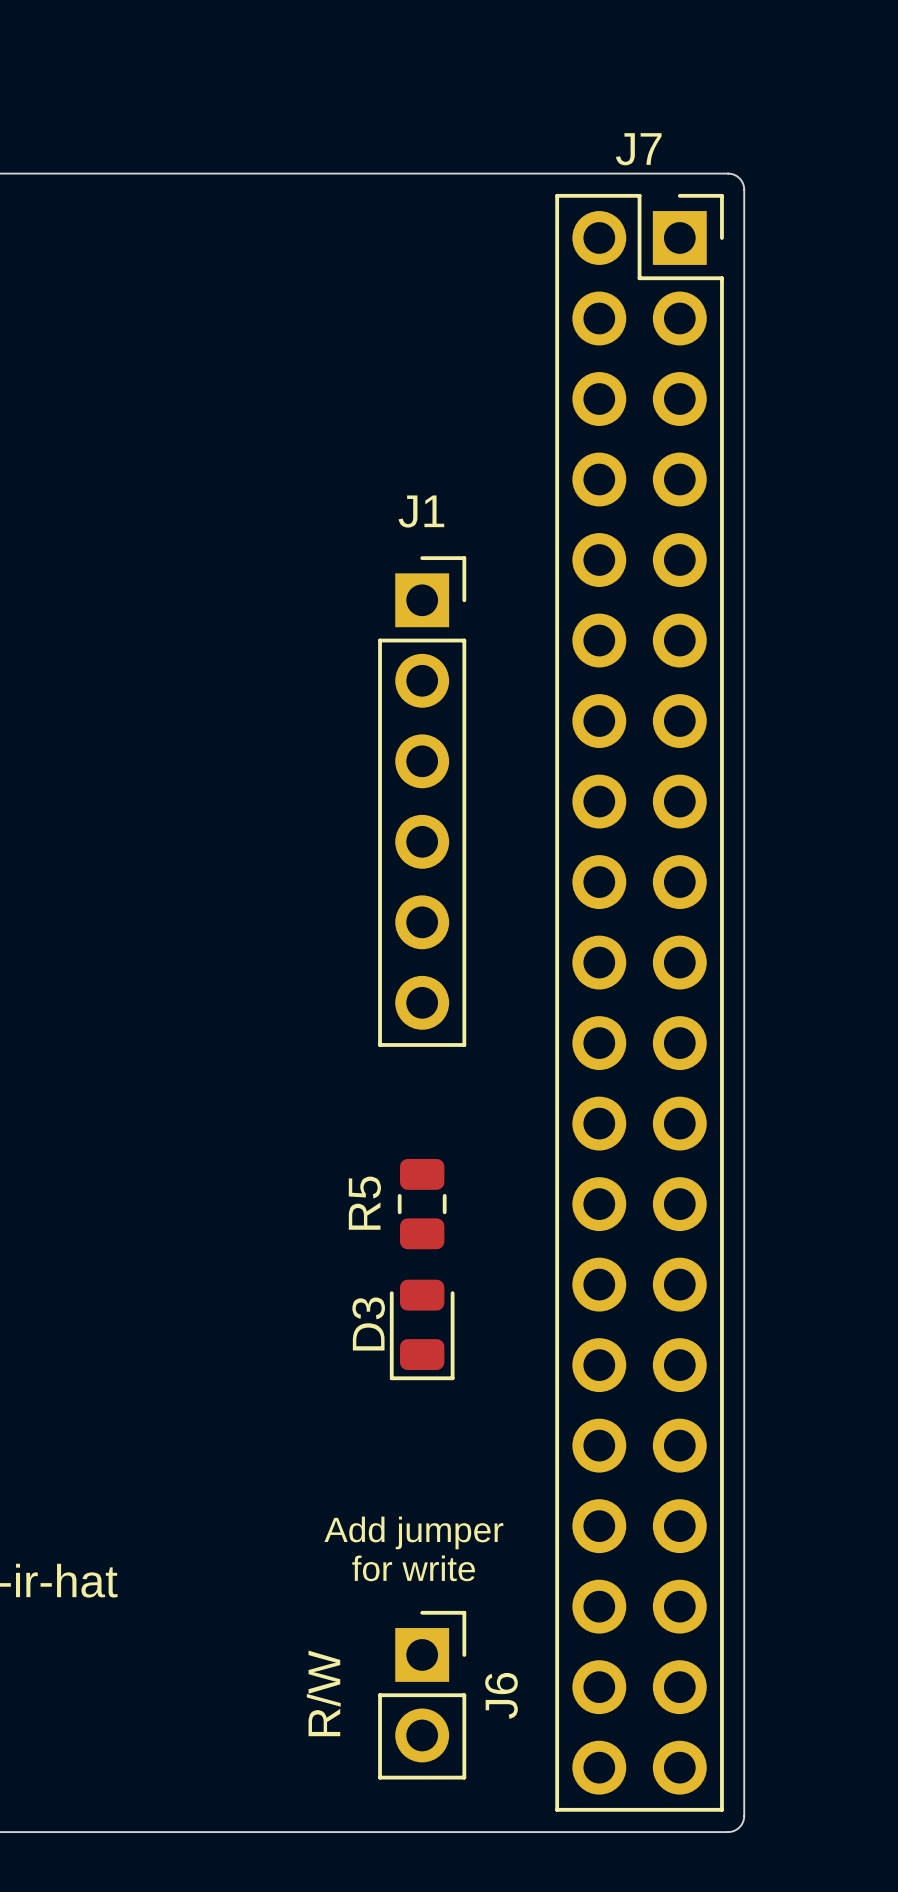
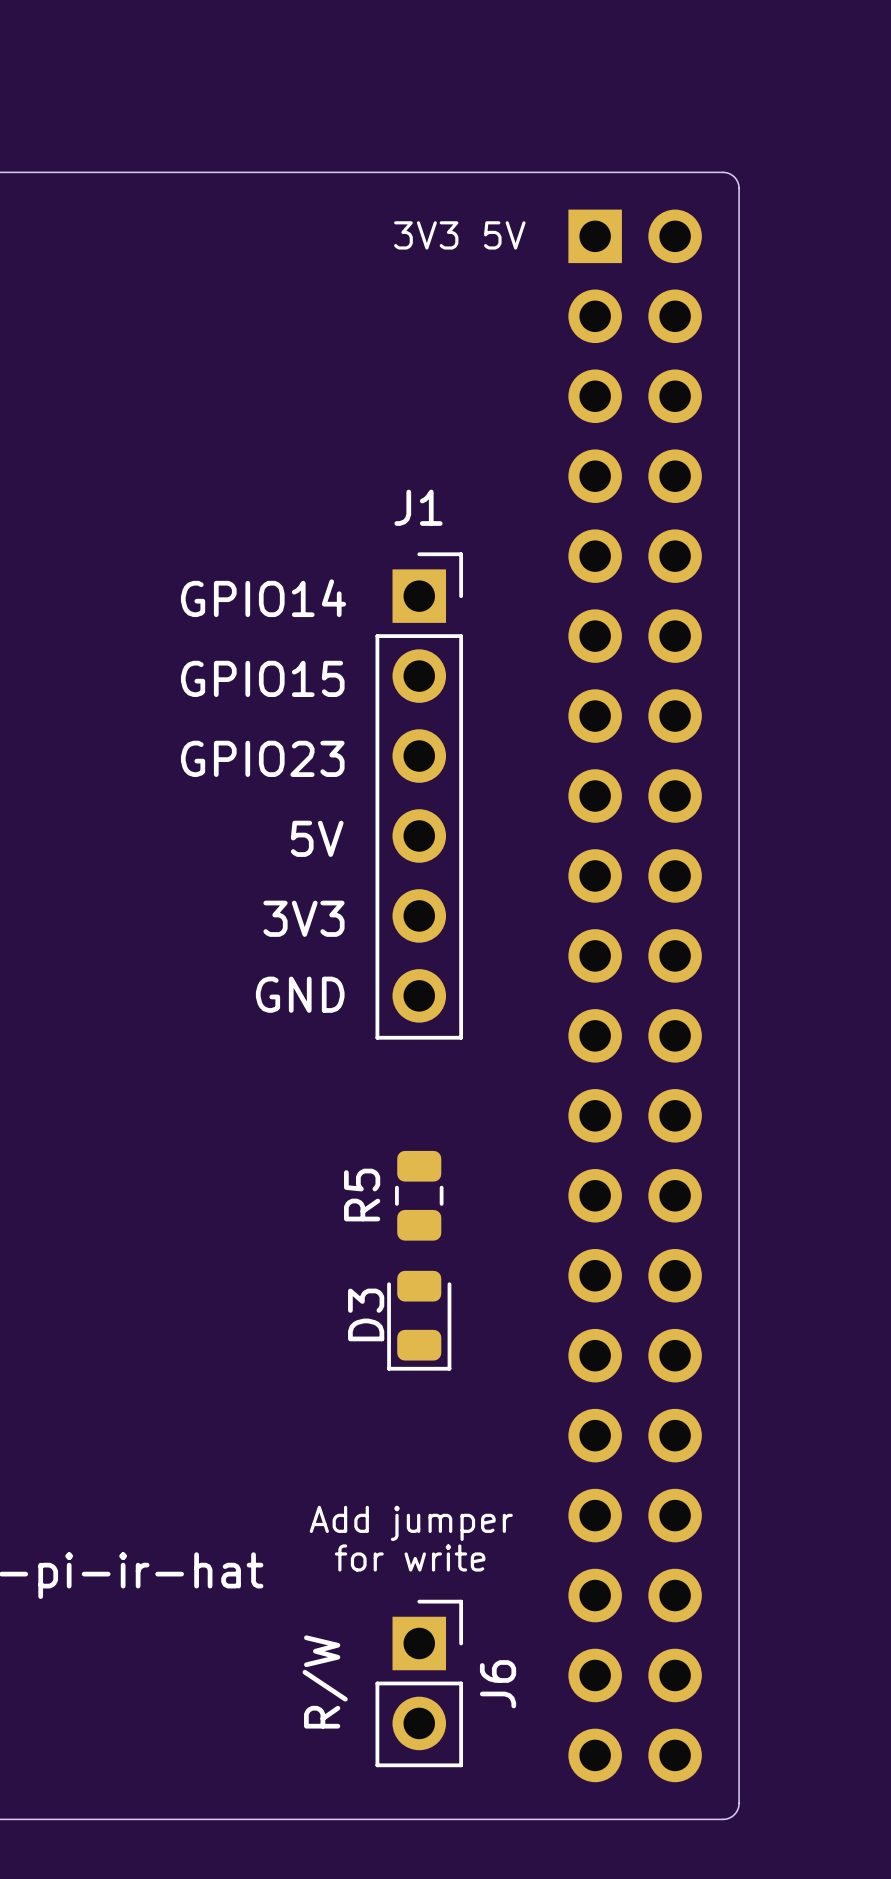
text: none -> 3V3 5V (459, 235)
text: none -> GPIO14 (263, 598)
text: none -> GPIO15 (262, 678)
text: none -> GPIO23 (262, 758)
text: none -> 5V (317, 838)
text: none -> 3V3 (303, 918)
text: none -> GND (300, 994)
J7 side: top (639, 1002) -> bottom (635, 995)

